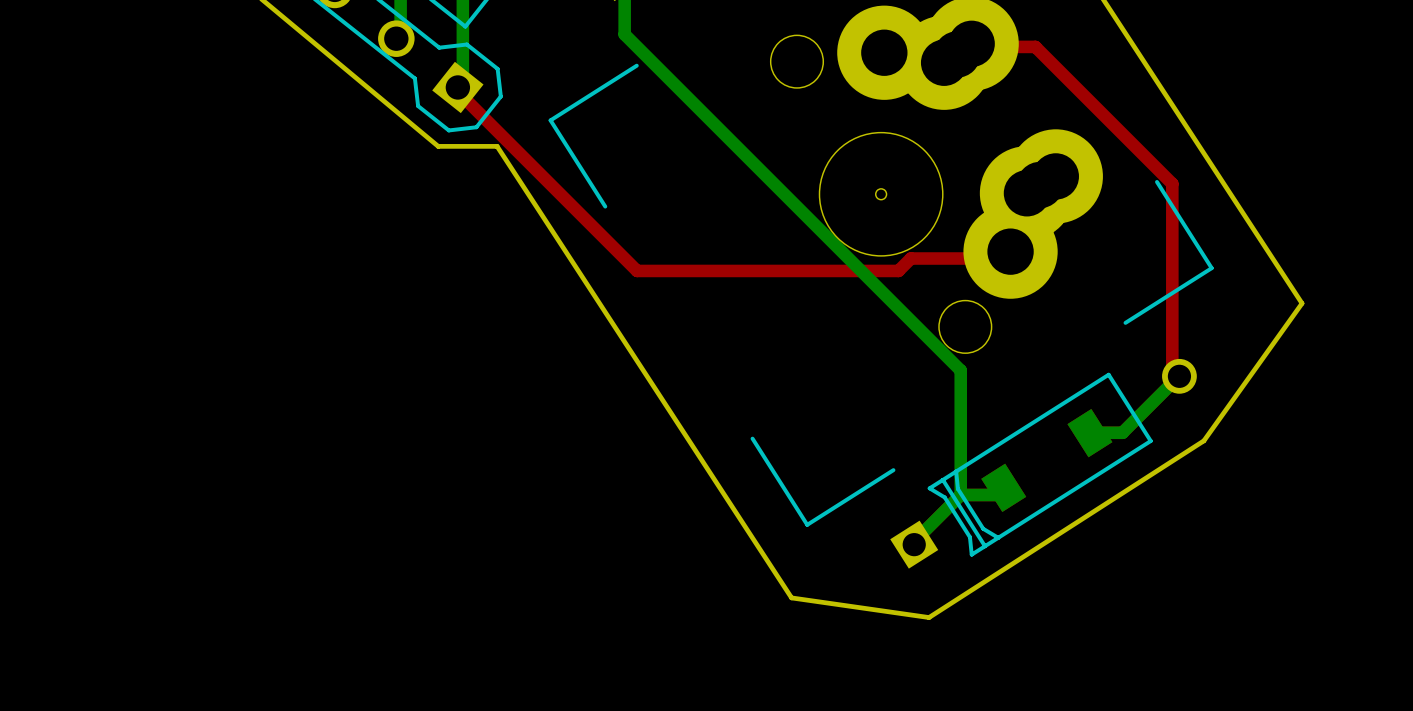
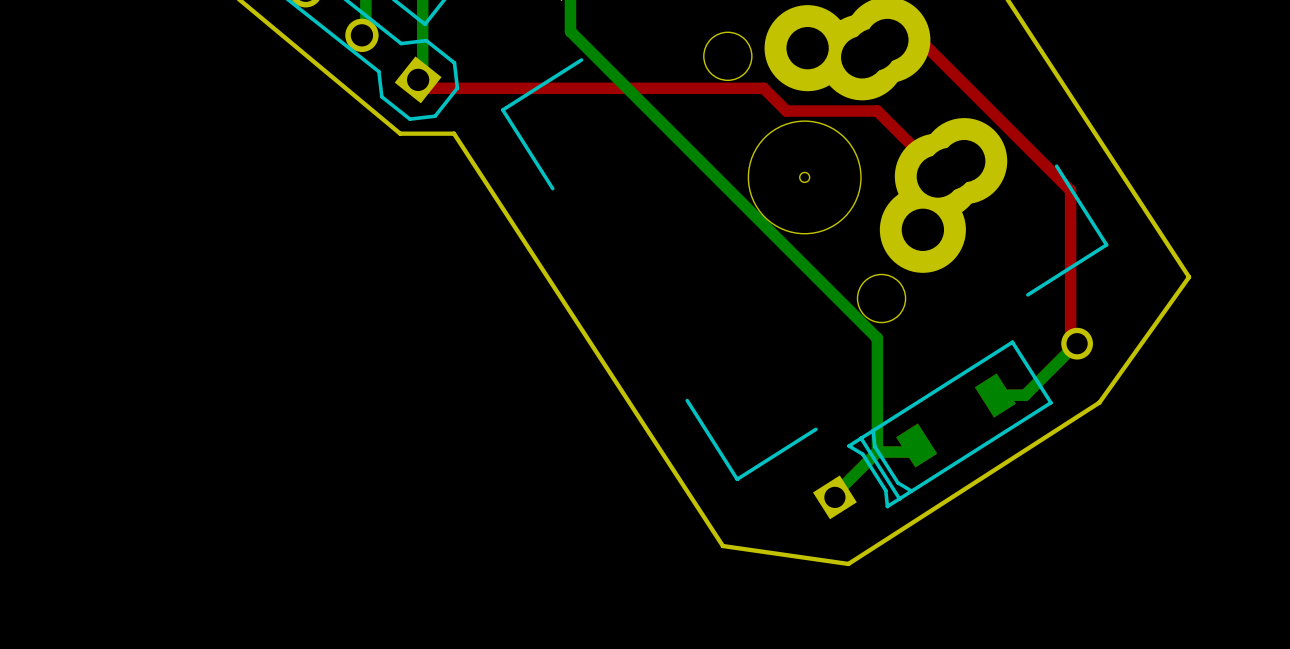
top track: (1010, 46) (1035, 46) (1172, 183) (1172, 208) -> (922, 42) (1070, 190)
top track: (462, 96) (637, 270) (898, 270) (910, 258) (1010, 258) (1010, 251) -> (422, 88) (763, 88) (786, 111) (877, 111) (934, 167) (956, 167)

